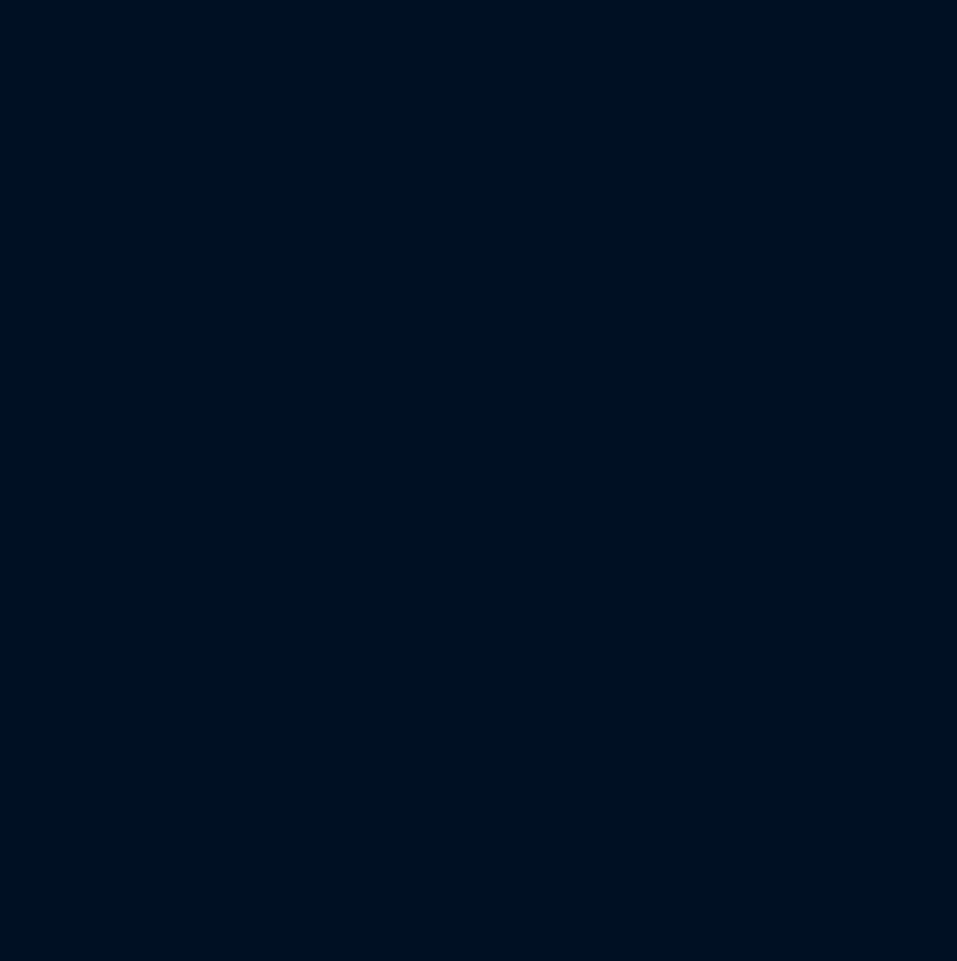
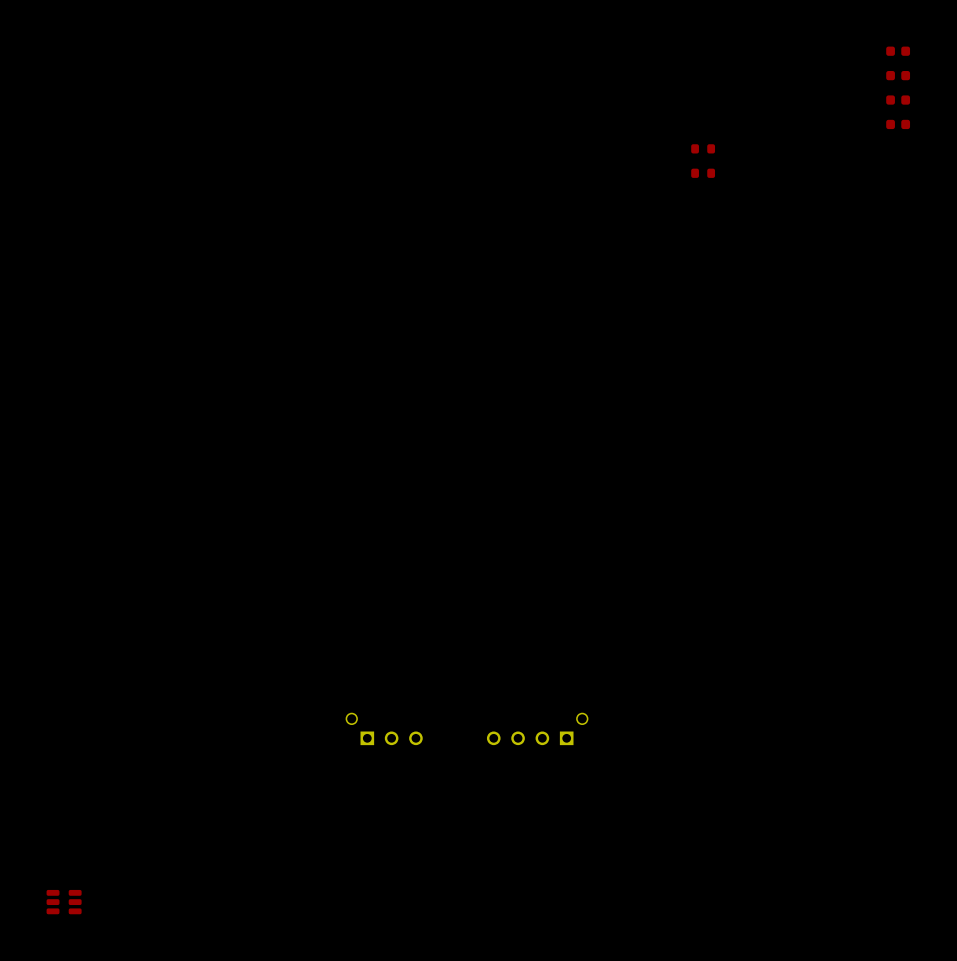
part: none -> (898, 51)
part: none -> (898, 75)
part: none -> (898, 100)
part: none -> (898, 124)
part: none -> (703, 148)
part: none -> (703, 173)
part: none -> (384, 729)
part: none -> (537, 729)
part: none -> (64, 902)

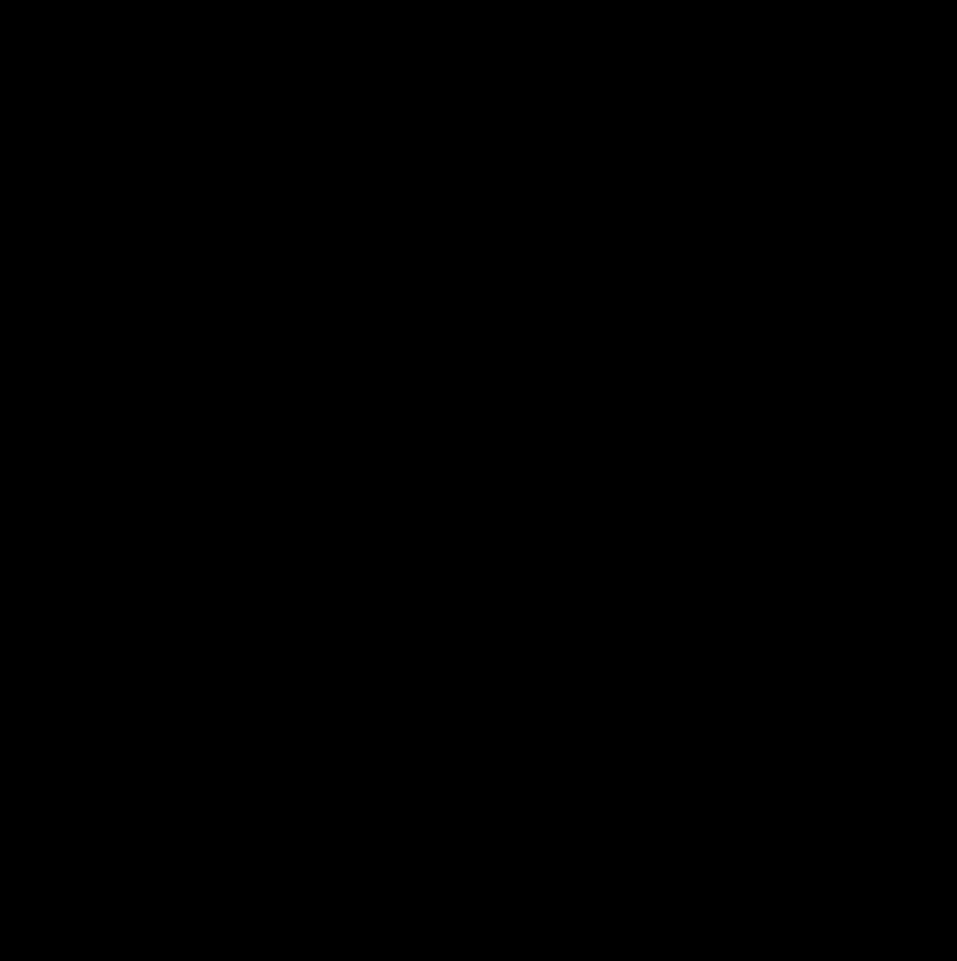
part: (898, 51) -> none
part: (898, 75) -> none
part: (898, 100) -> none
part: (898, 124) -> none
part: (703, 148) -> none
part: (703, 173) -> none
part: (384, 729) -> none
part: (537, 729) -> none
part: (64, 902) -> none

